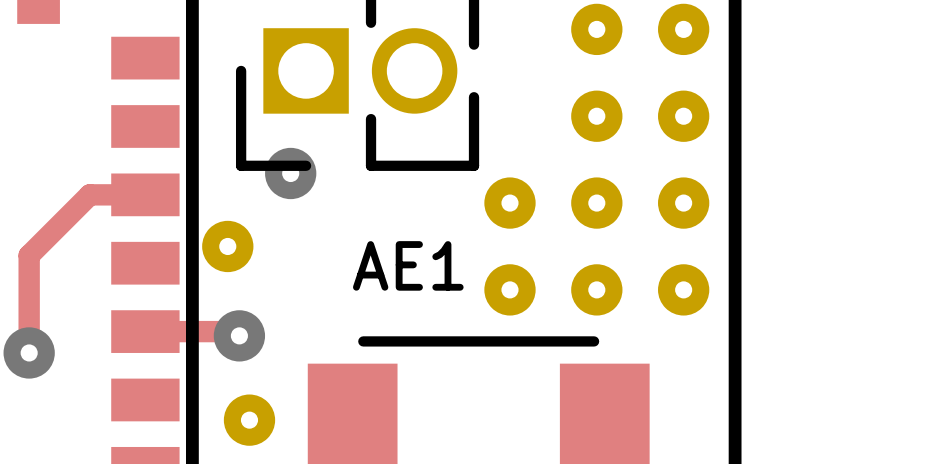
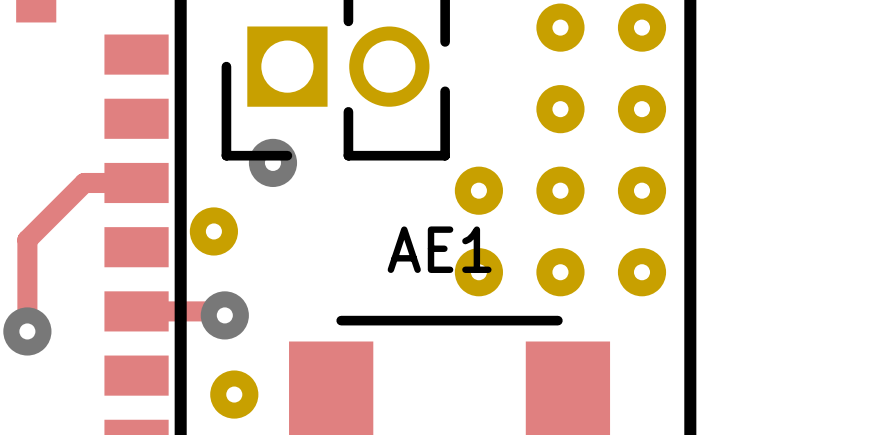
AE1 name position: AE1 (408, 265) -> AE1 (439, 249)

